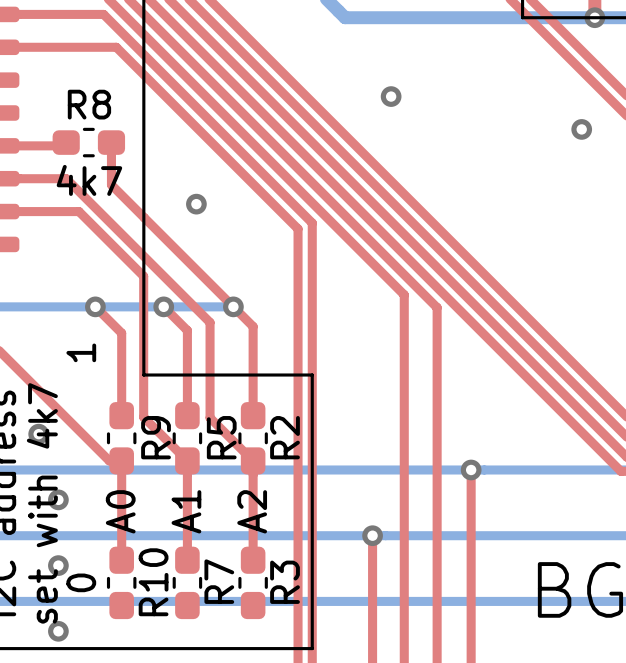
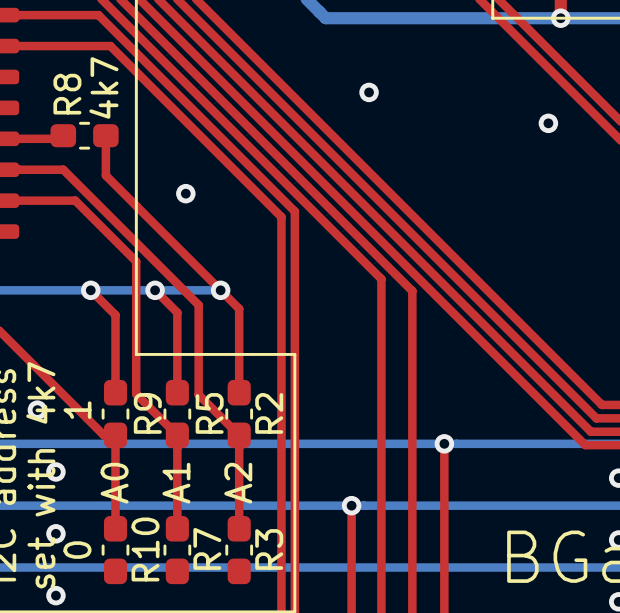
R8 name rotation: 0° (89, 104) -> 90° counterclockwise (67, 94)
text rotation: 0° (89, 180) -> 90° counterclockwise (103, 87)
text position: 4k7 (89, 180) -> 4k7 (103, 87)
text position: 1 (81, 352) -> 1 (77, 410)

